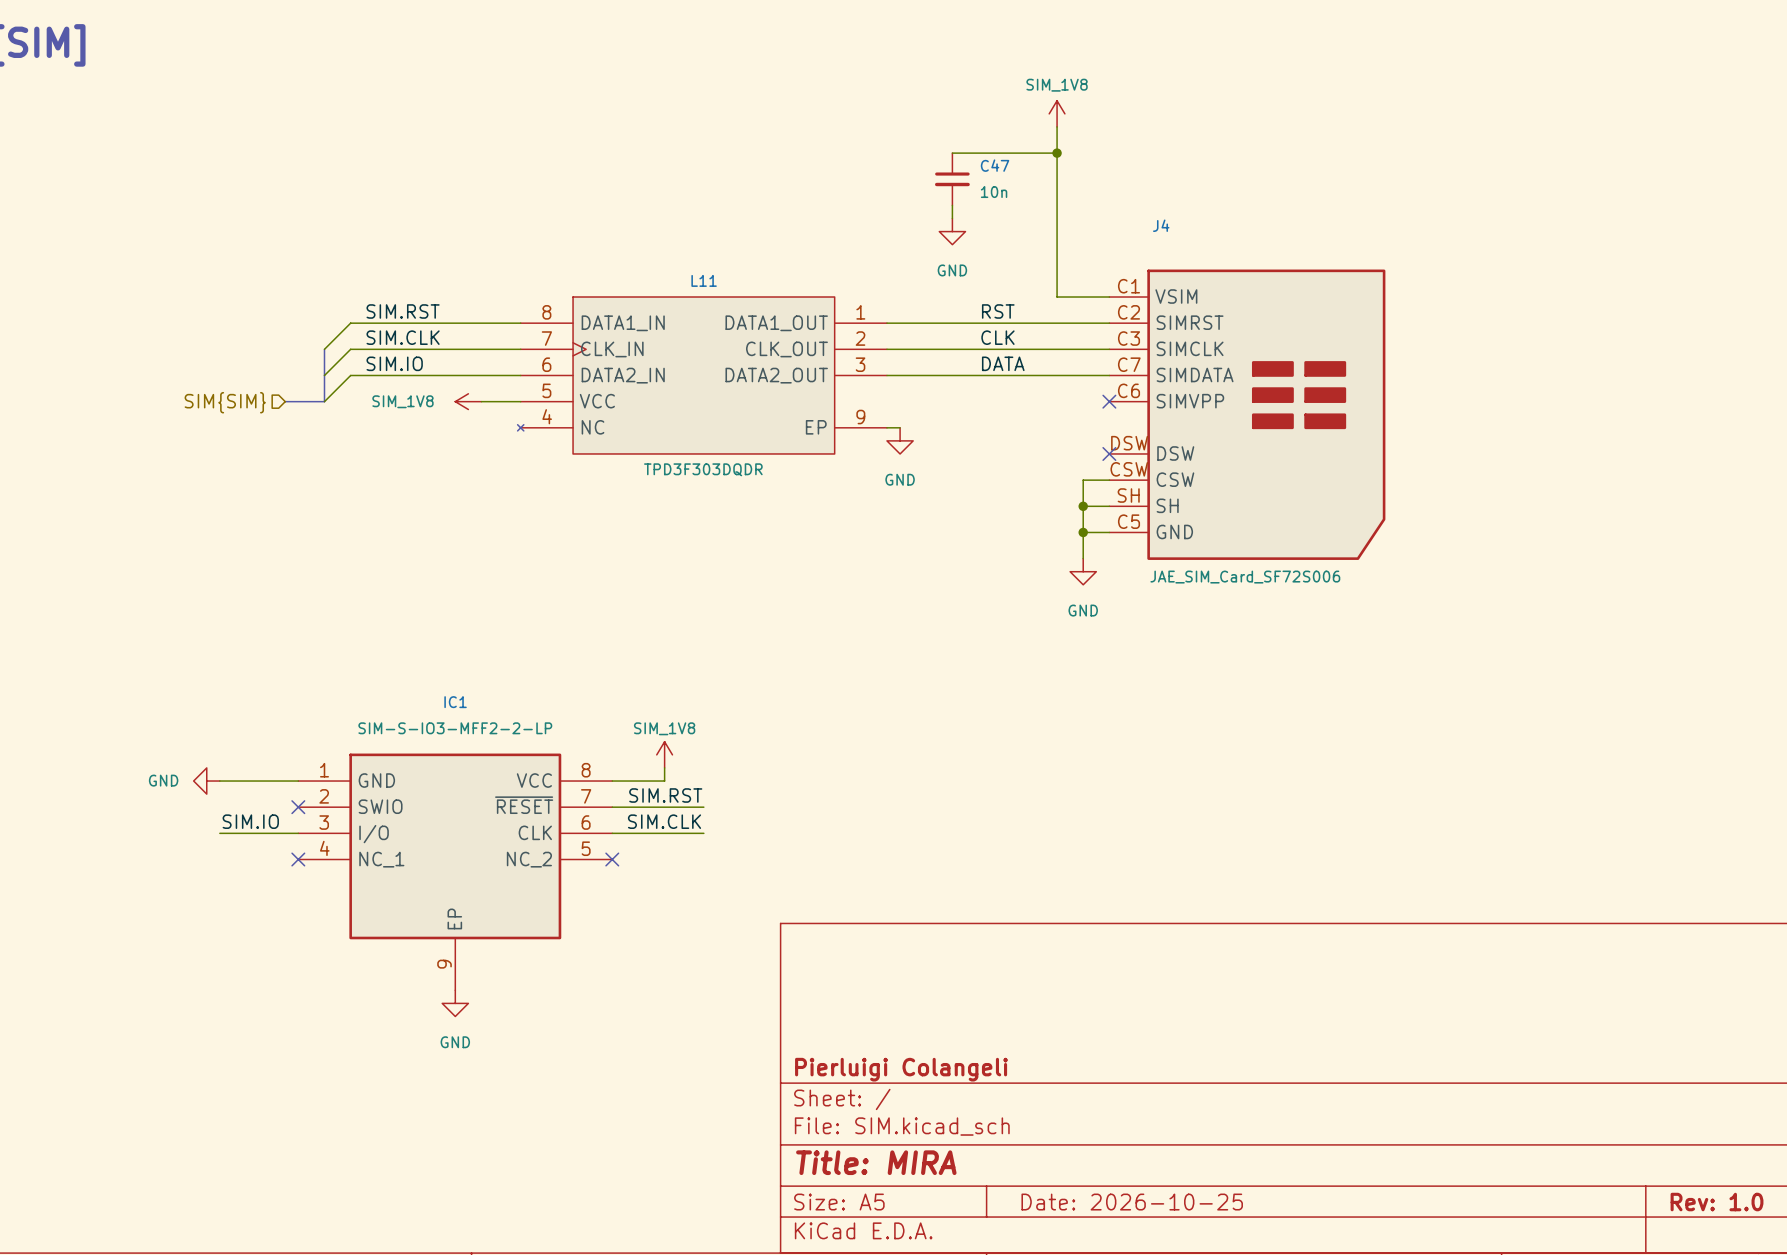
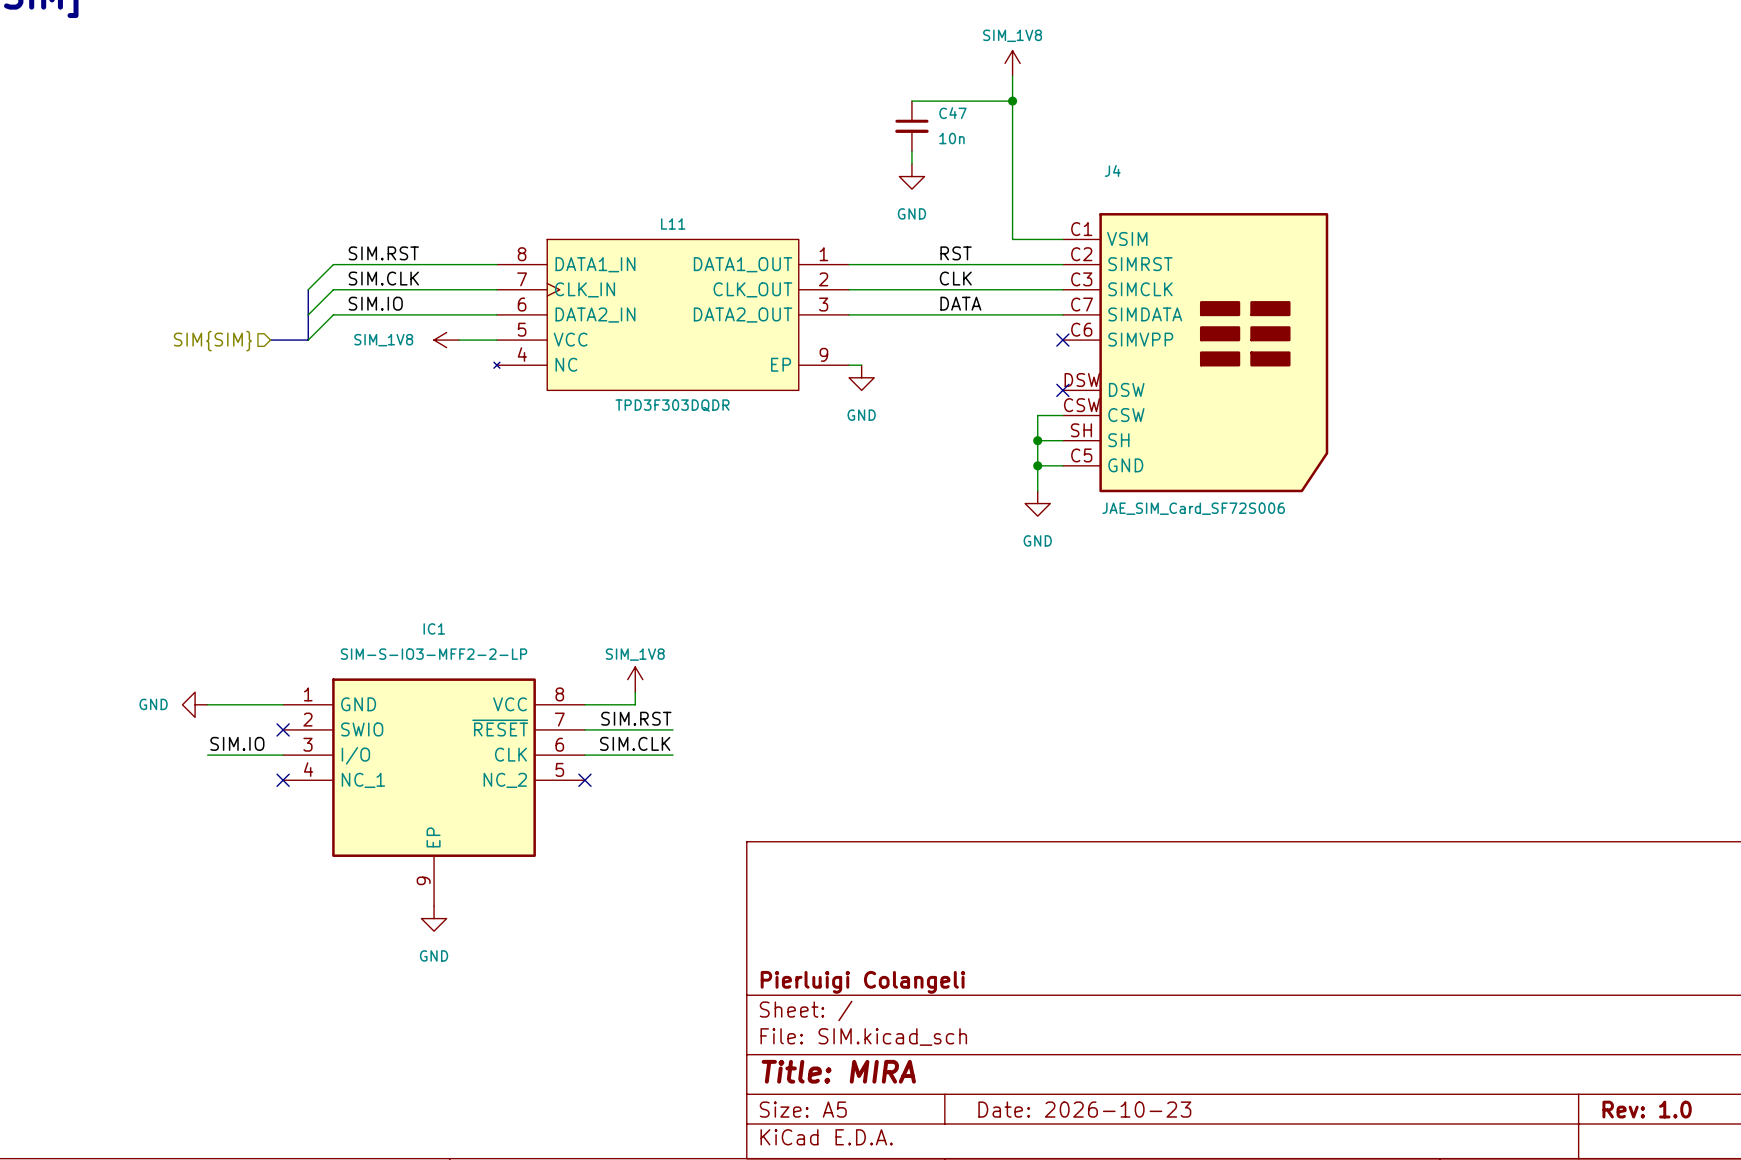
title block: Date: 2026-10-25 (1132, 1202) -> Date: 2026-10-23 (1084, 1109)

